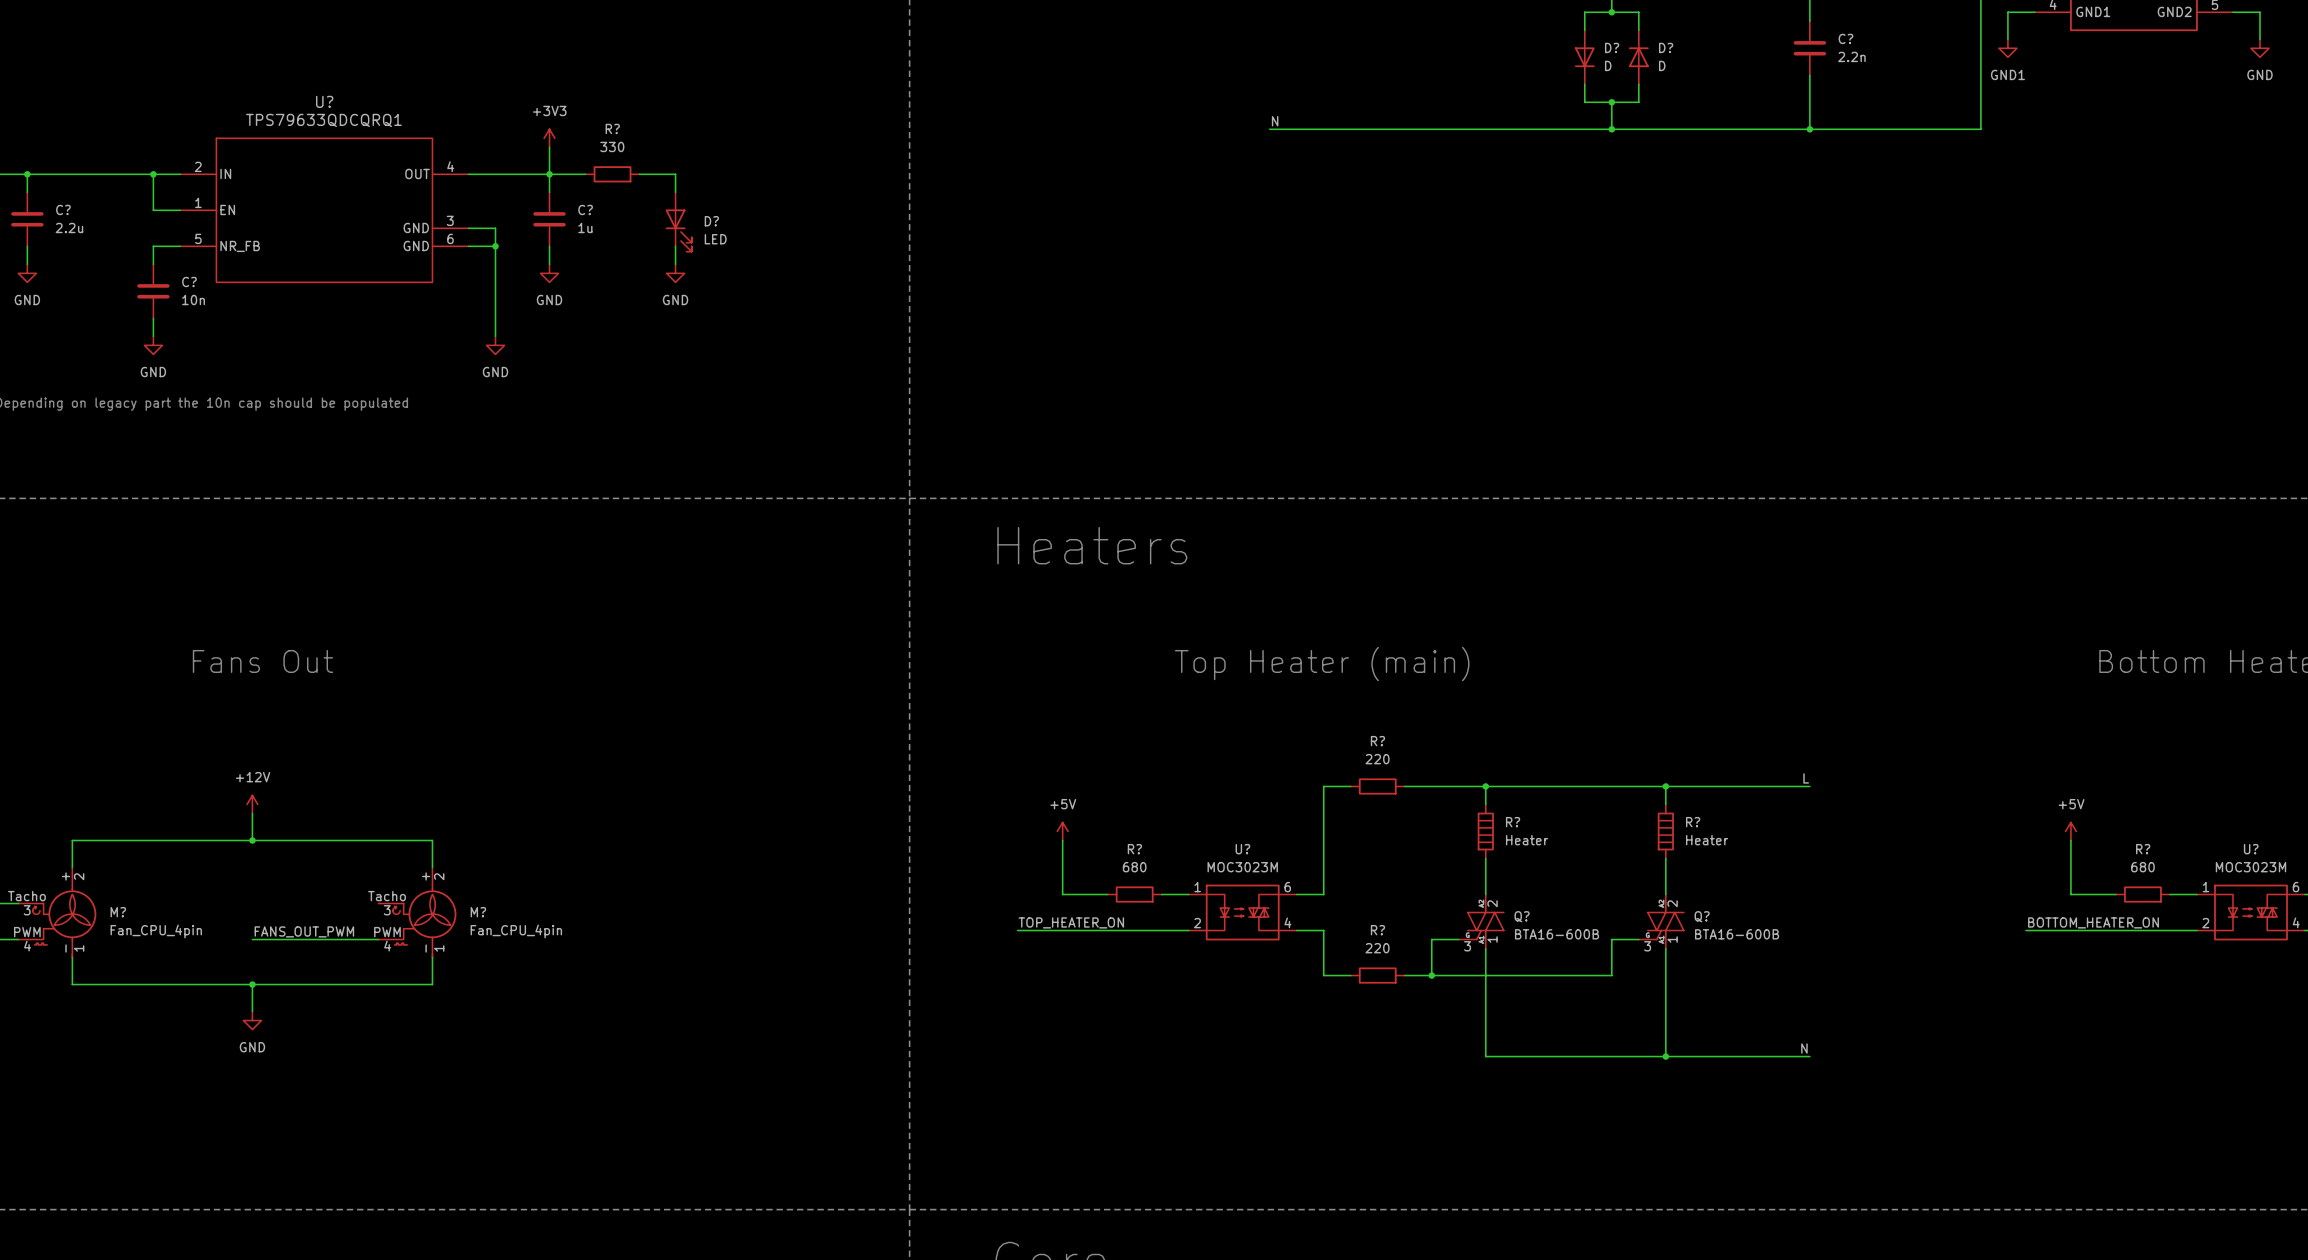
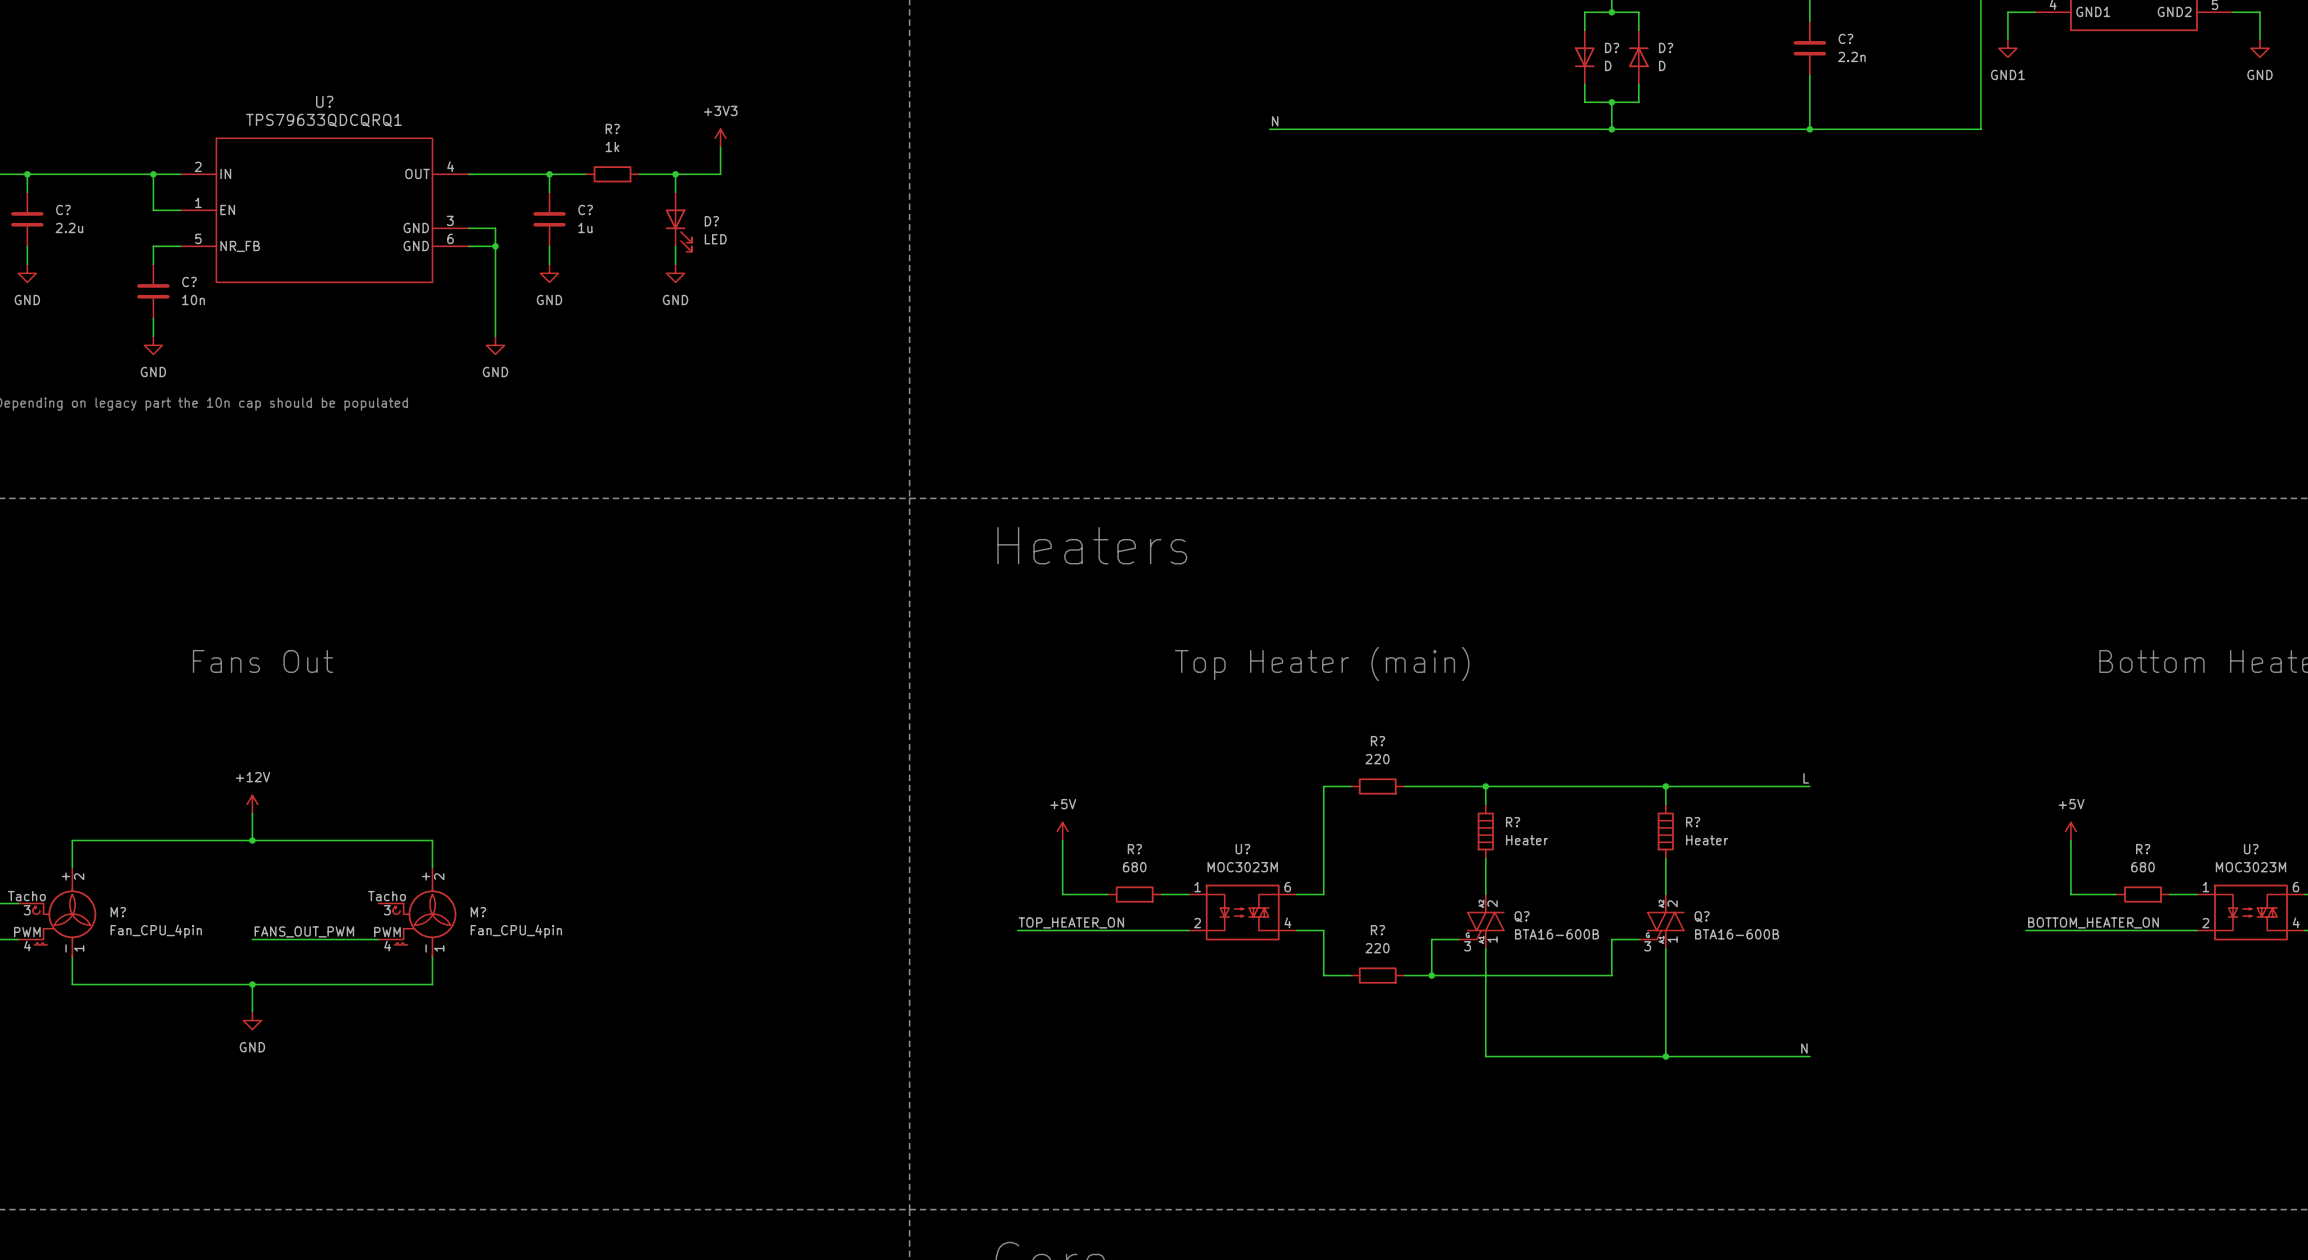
power symbol position: +3V3 (549, 138) -> +3V3 (720, 138)
R? value: 330 (612, 146) -> 1k (612, 146)
wire: (549, 147) (549, 174) -> none
wire: none -> (720, 147) (720, 174) (675, 174)
junction: none -> (675, 174)

